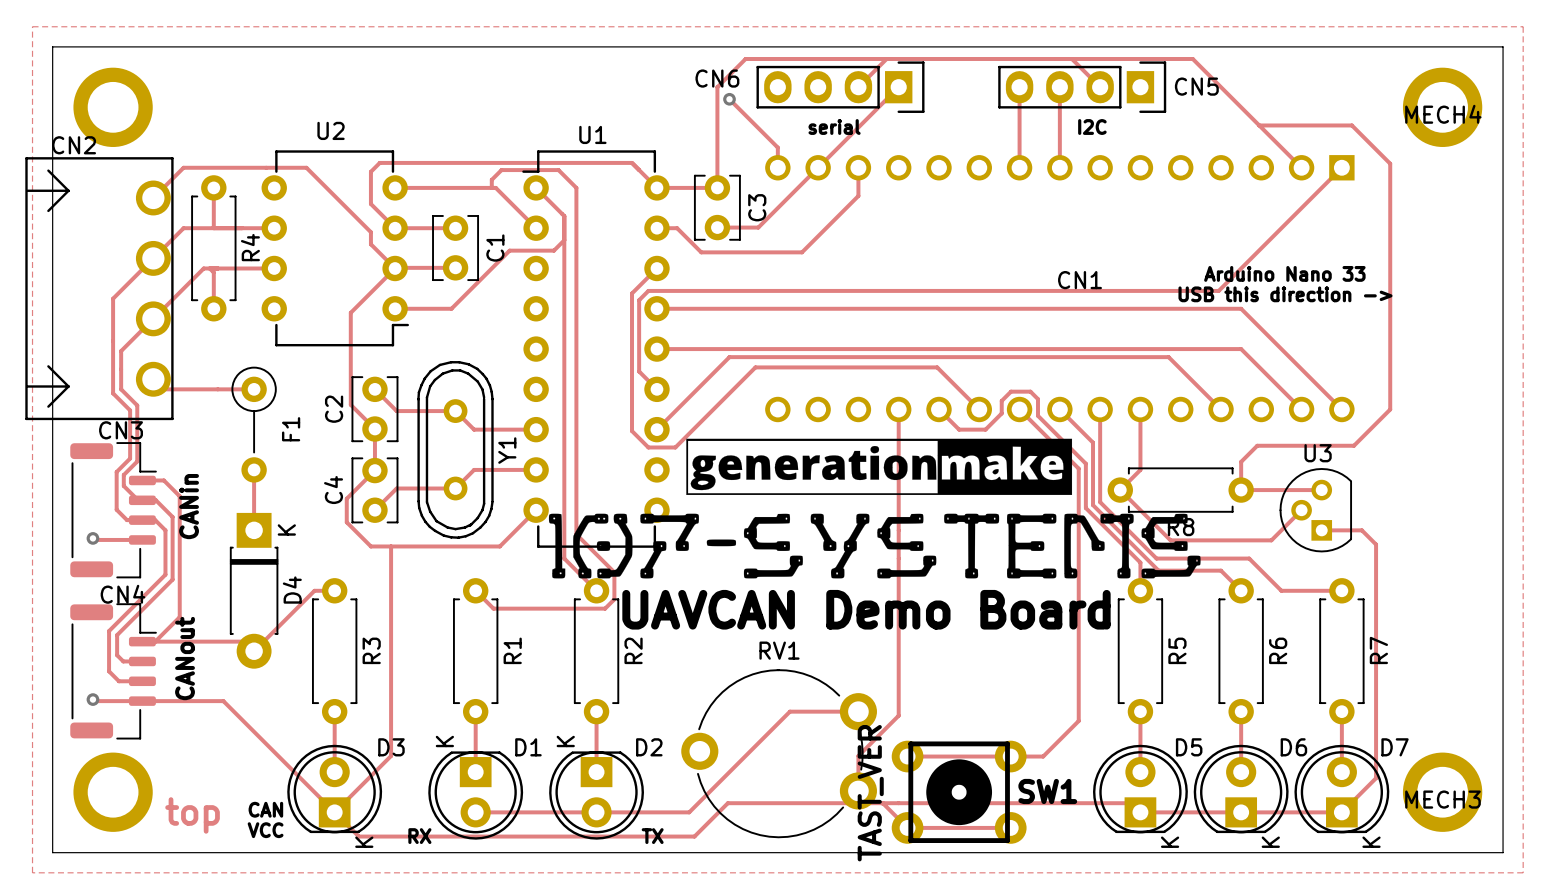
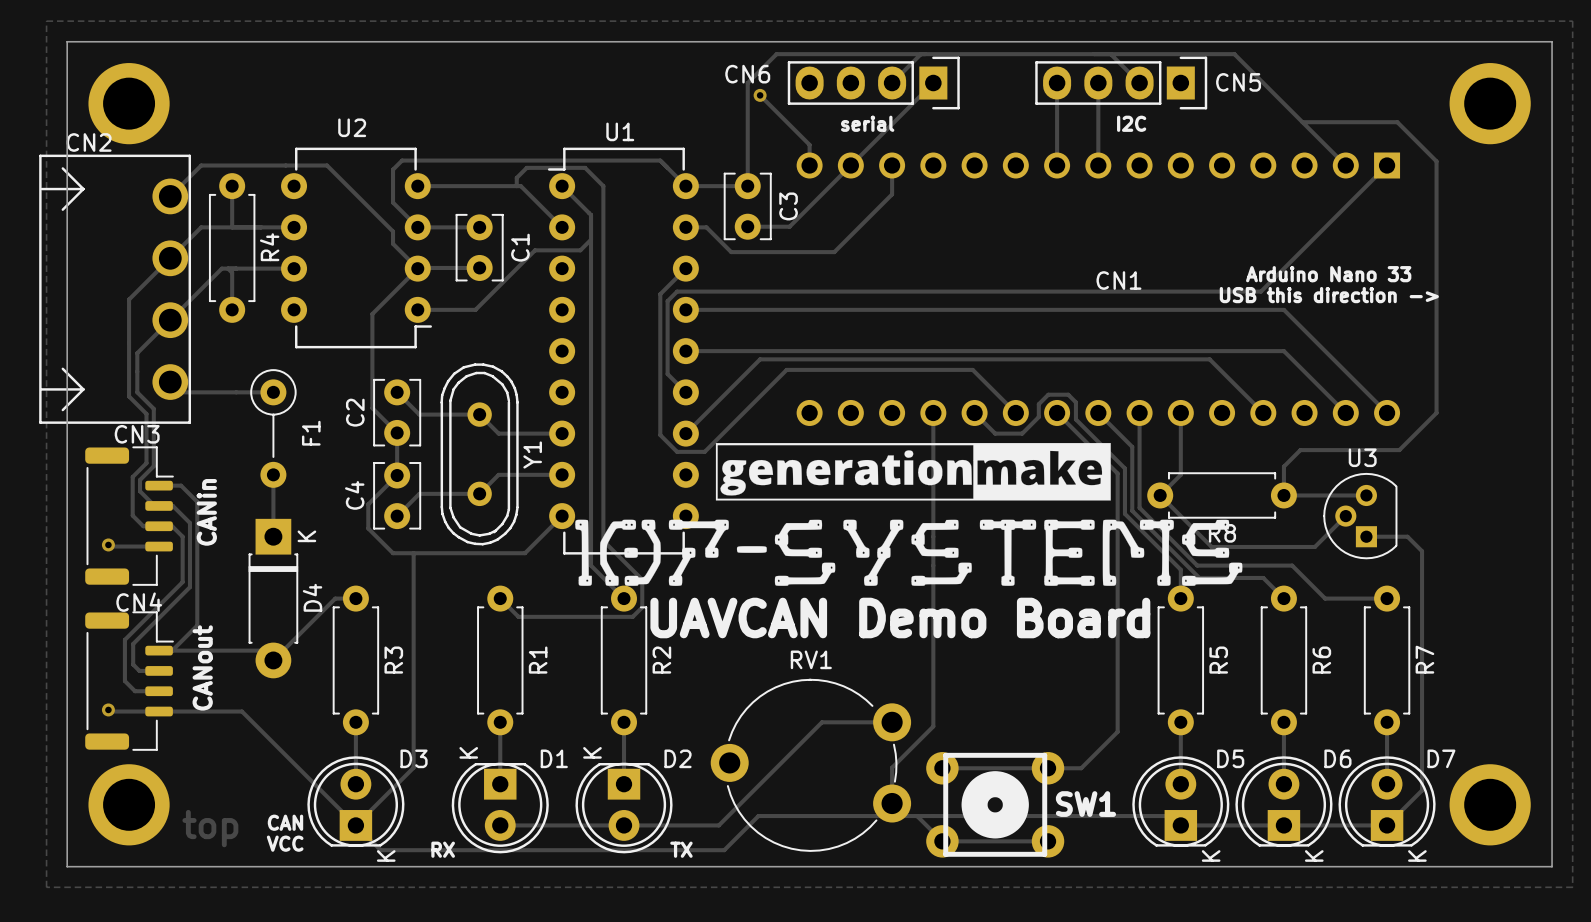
MECH4 name: MECH4 (1443, 114) -> none
SW1 value: TAST_VER (870, 793) -> none
MECH3 name: MECH3 (1442, 799) -> none

